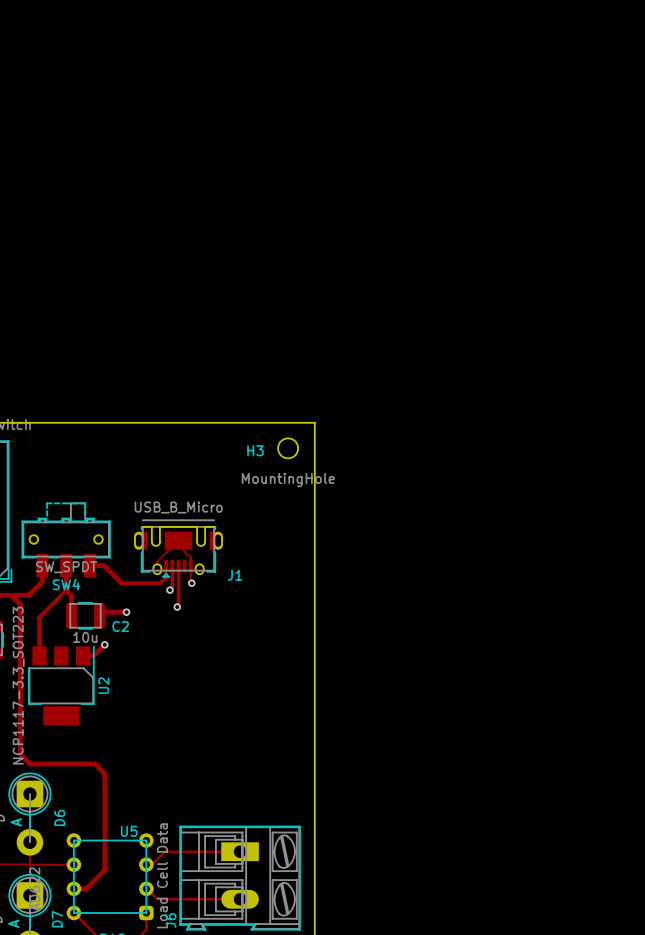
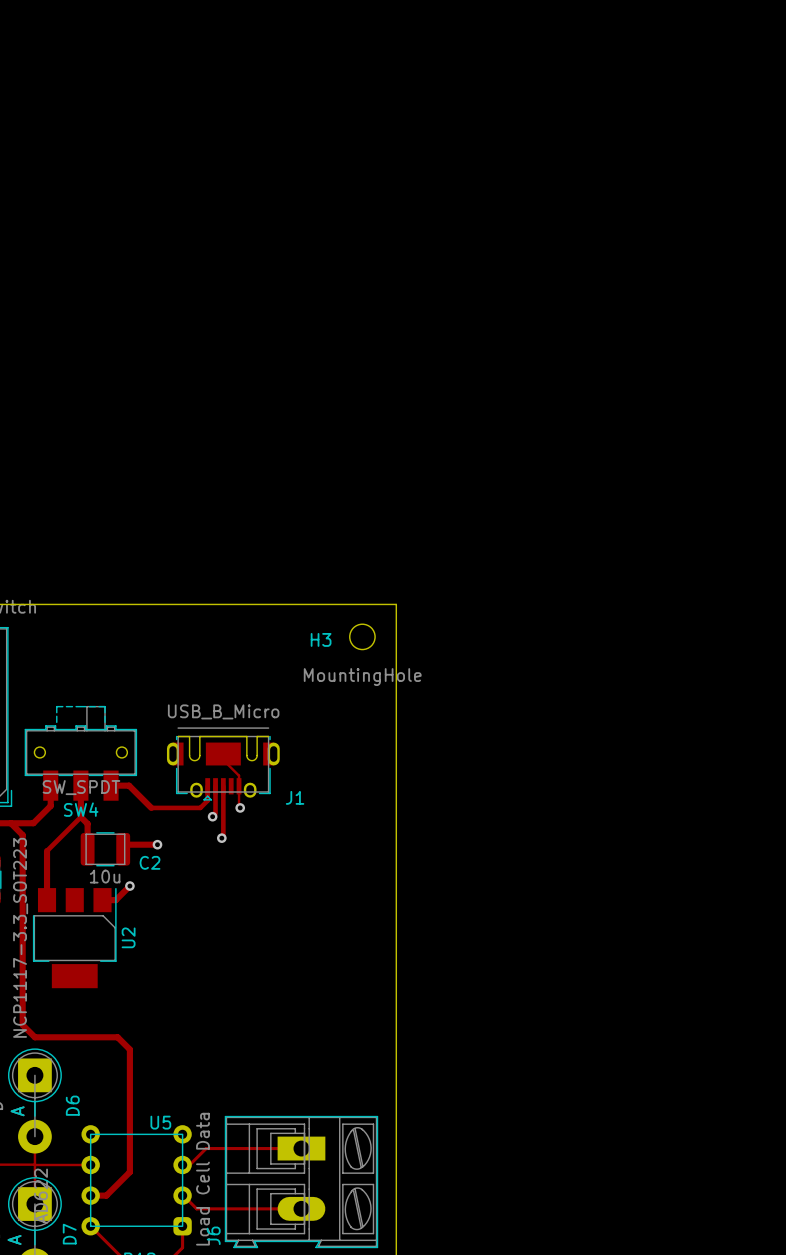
track: (178, 540) (157, 561) (157, 569) -> none

